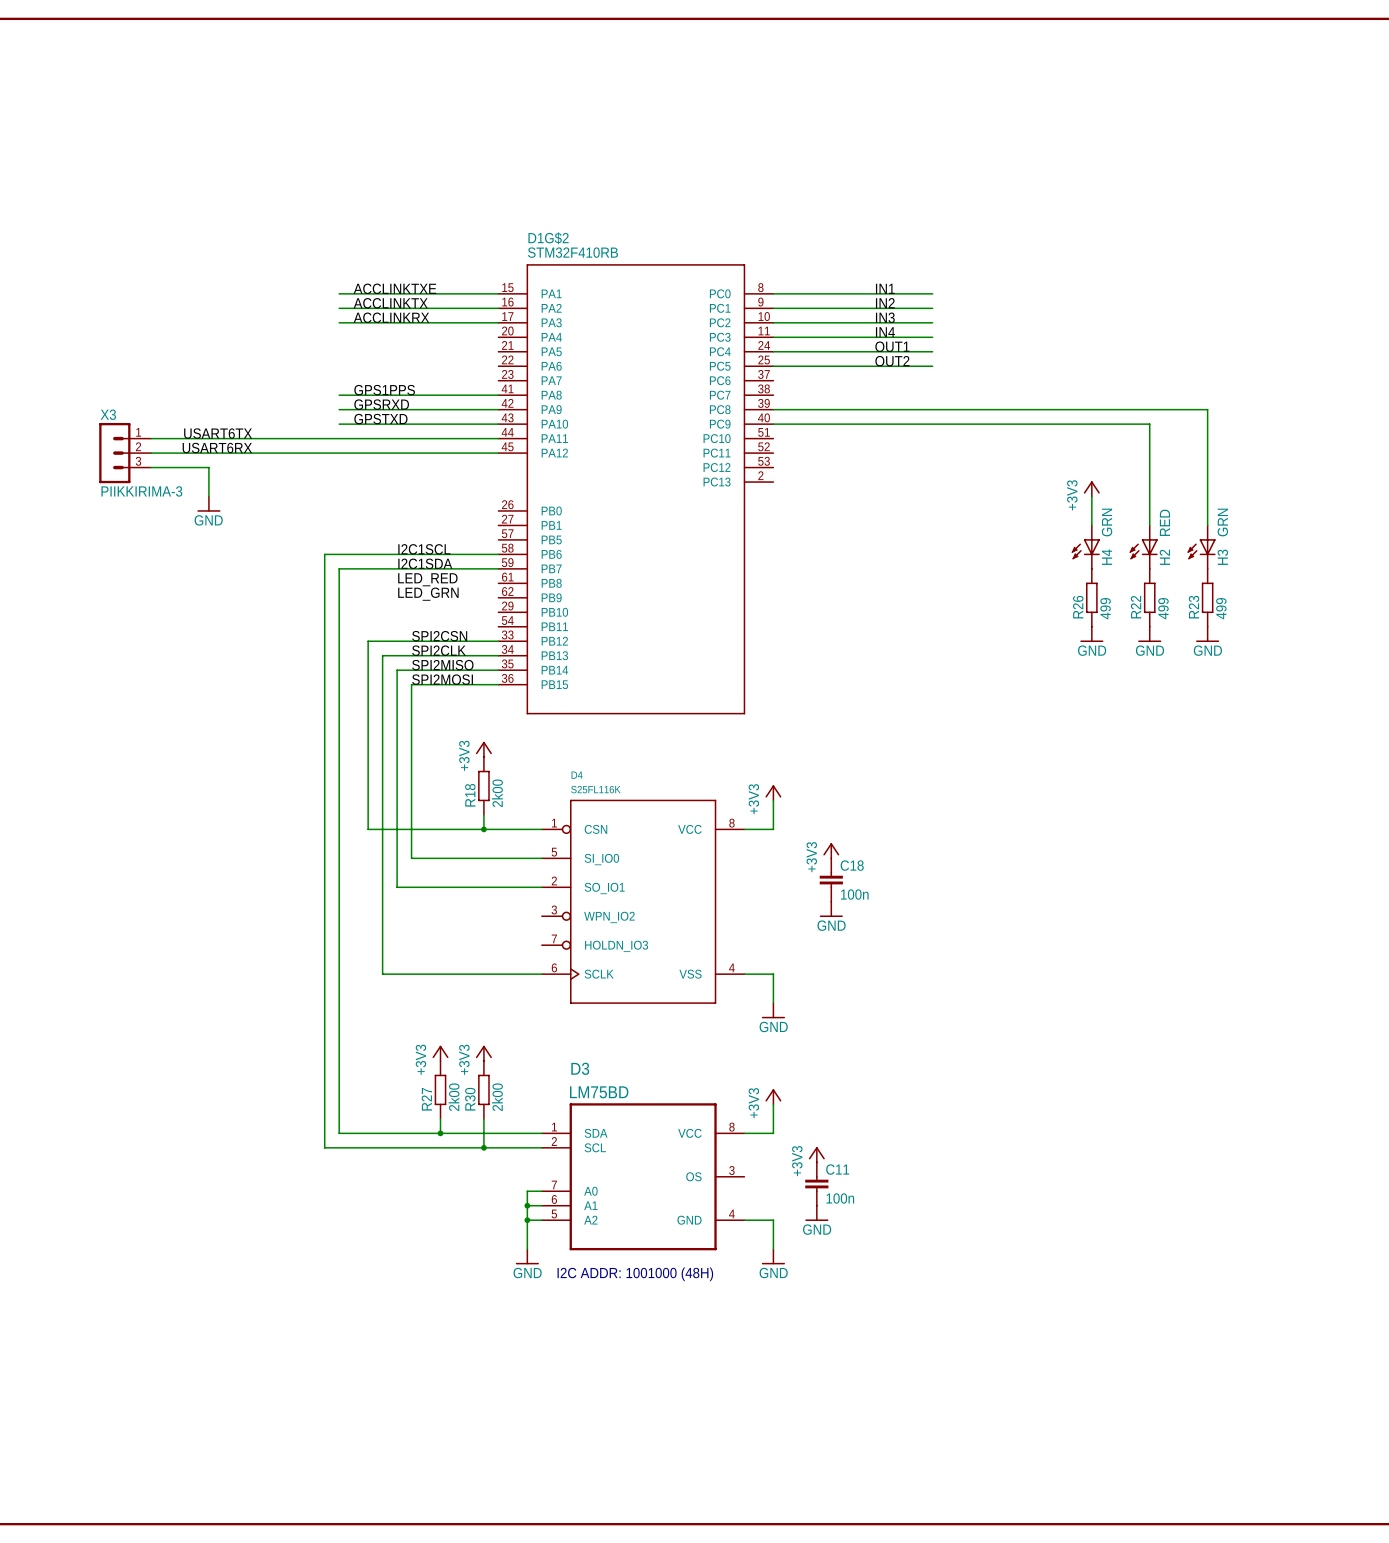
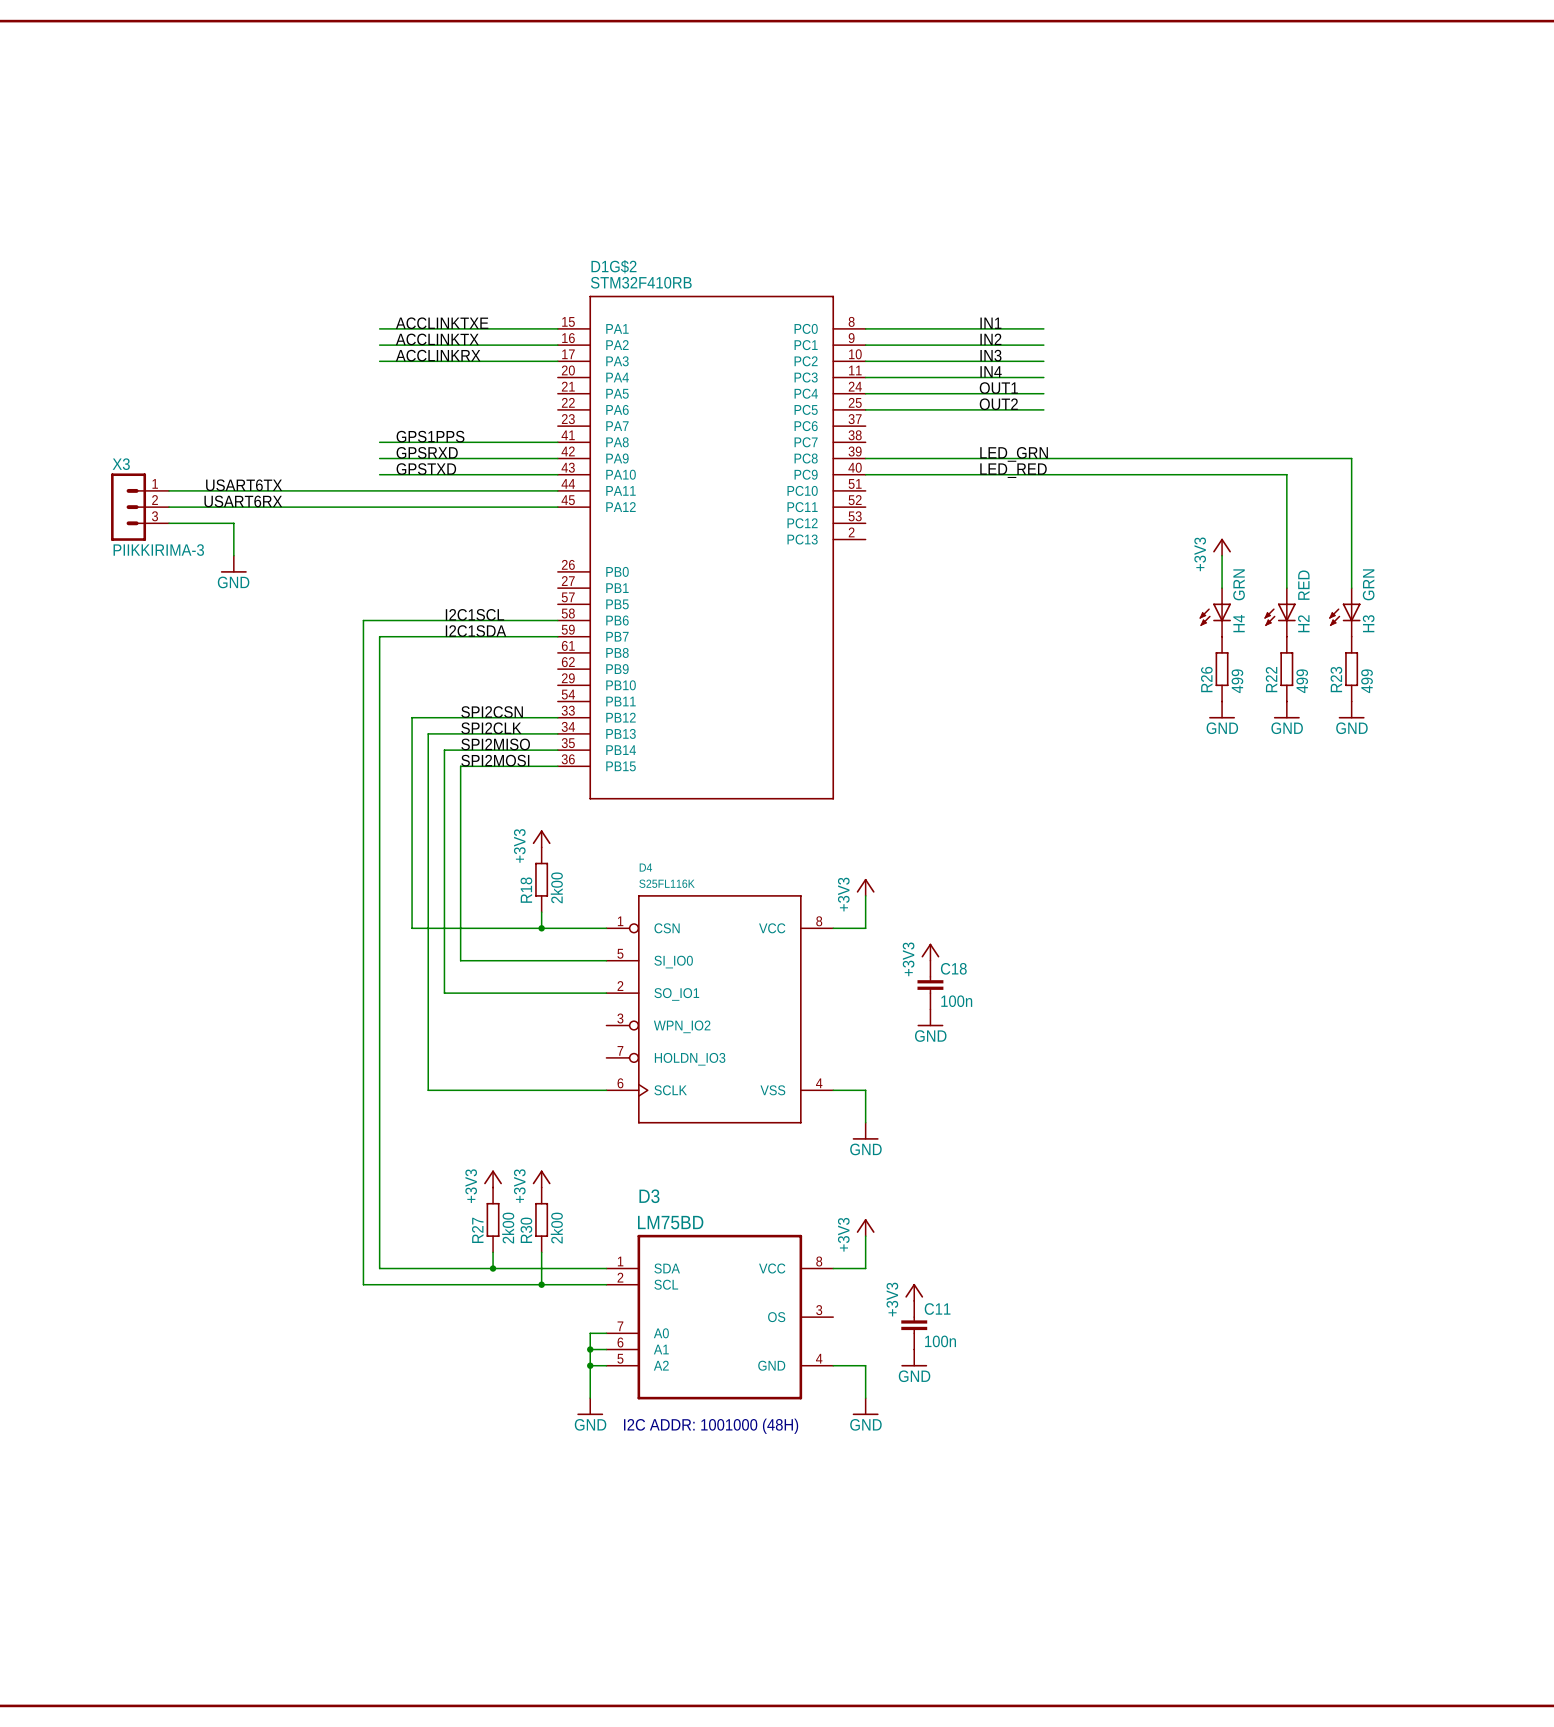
label: none -> LED_GRN (1014, 454)
label: none -> LED_RED (1013, 470)
label: LED_RED (427, 579) -> none
label: LED_GRN (428, 594) -> none

